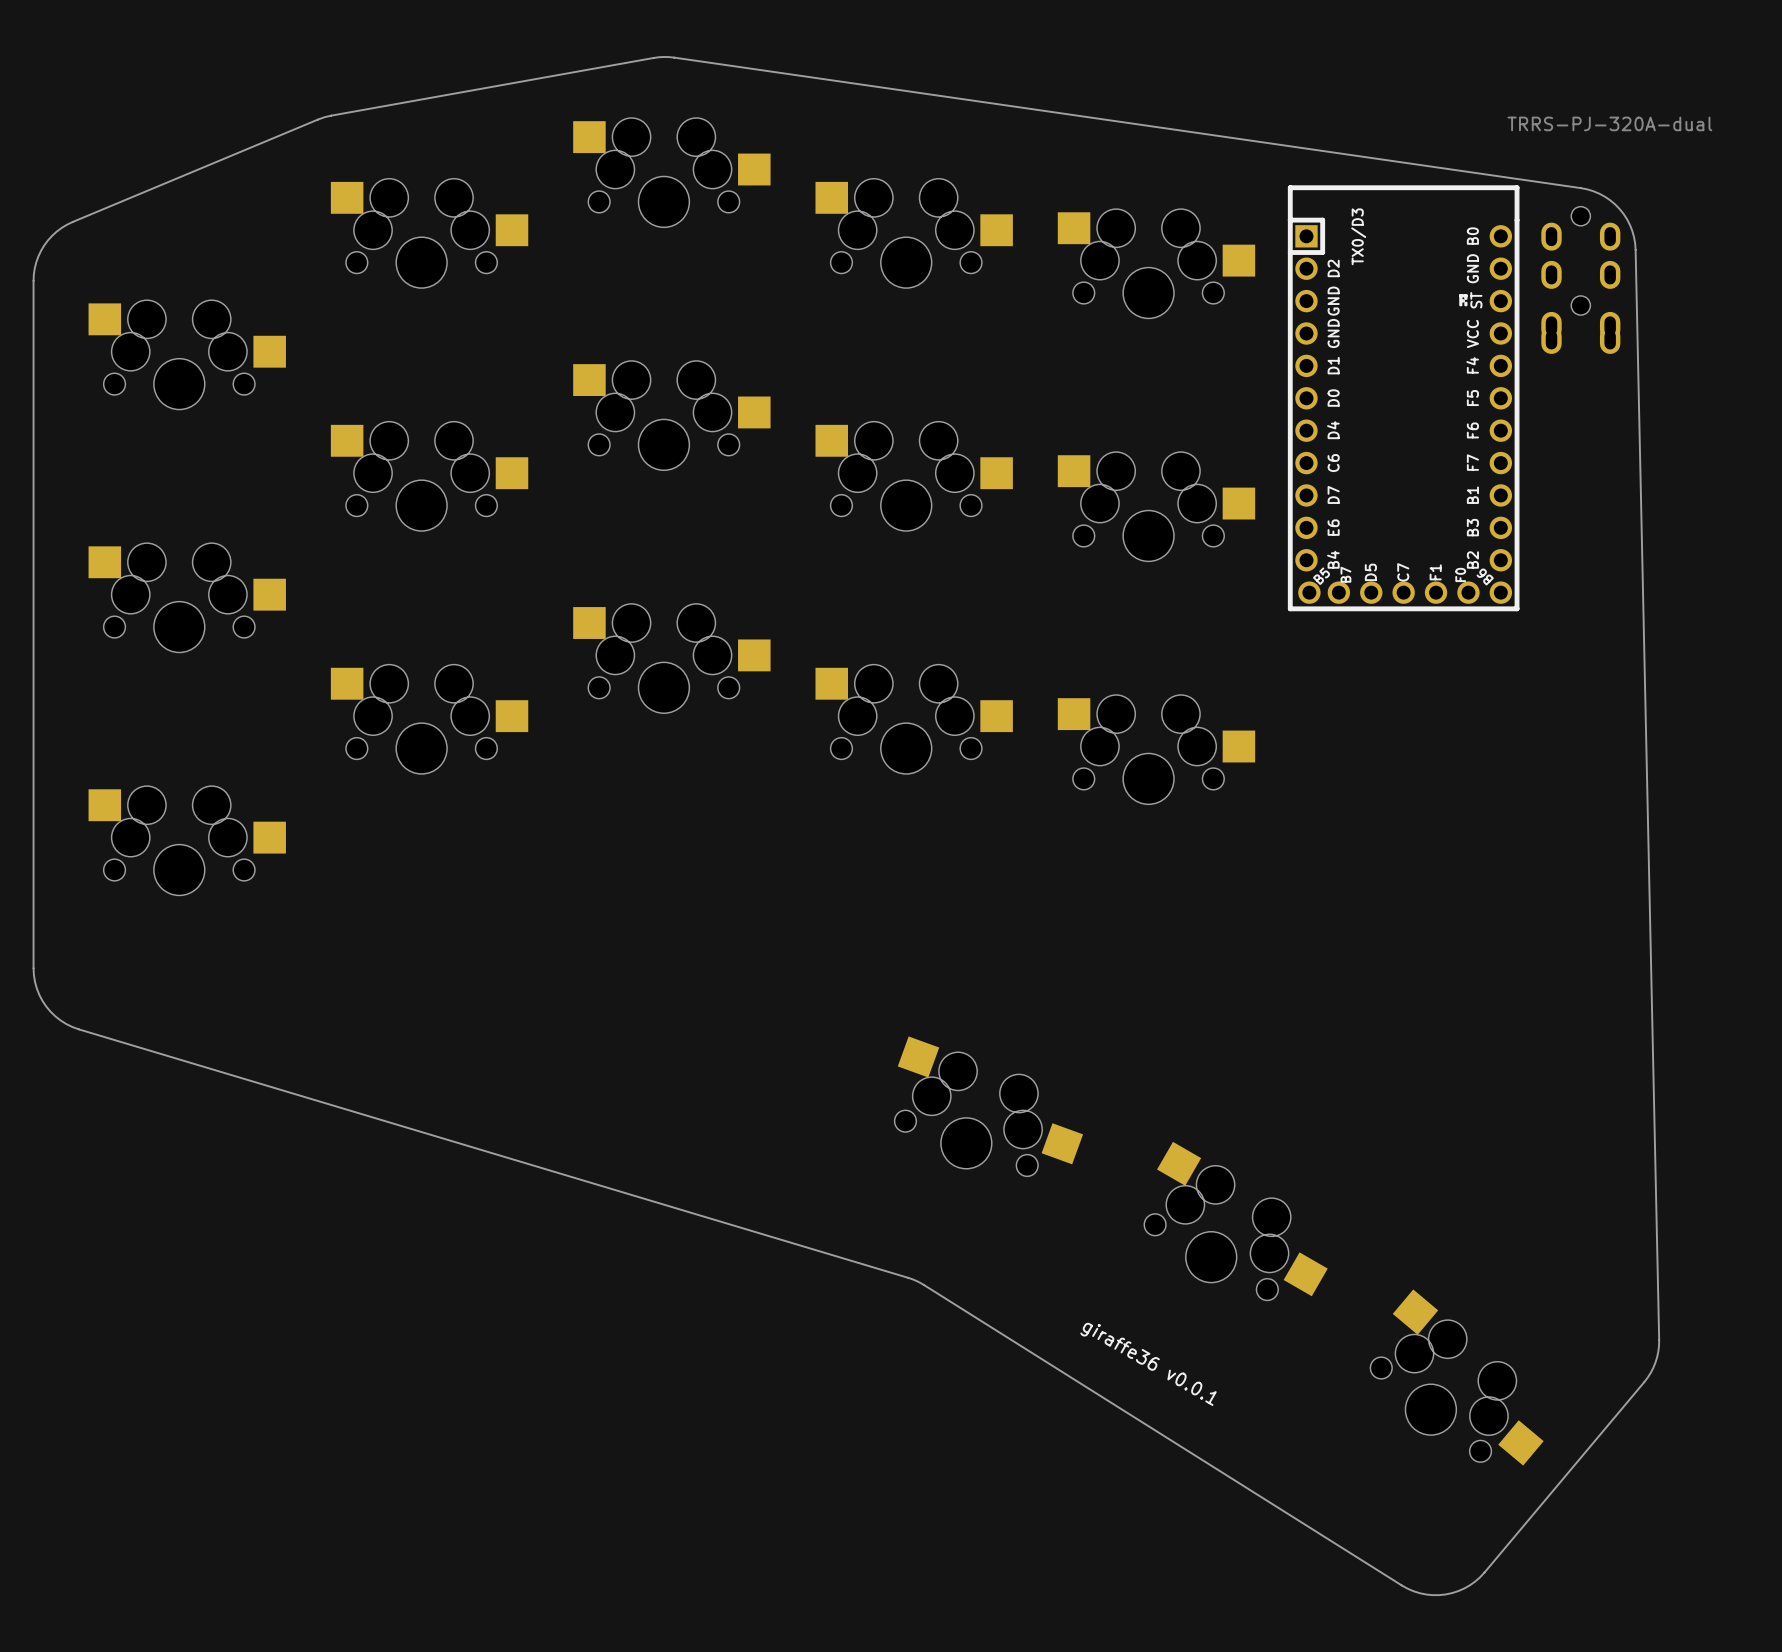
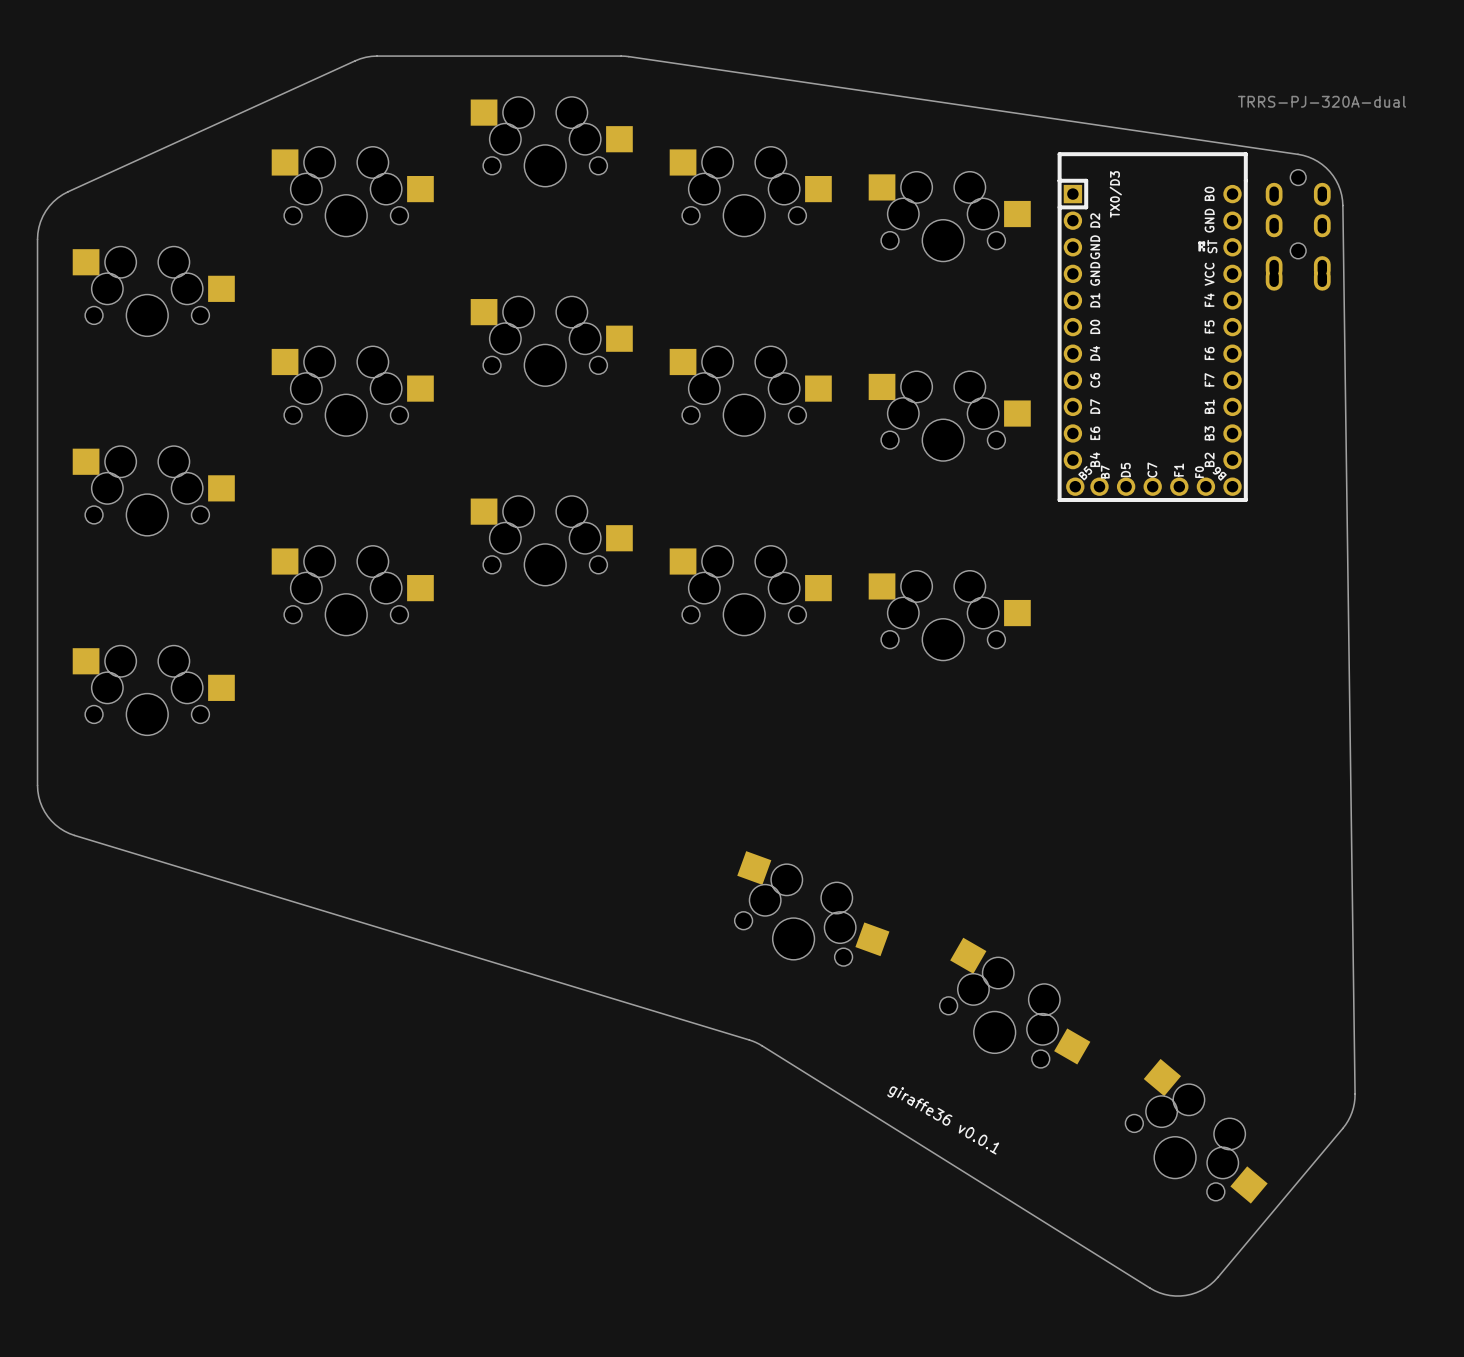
board edge: (674, 57) (1580, 188) (1604, 196) (1615, 204) (1627, 219) (1632, 231) (1635, 249) (1658, 1351) (1653, 1367) (1644, 1382) (1484, 1572) (1464, 1588) (1445, 1594) (1432, 1595) (1419, 1593) (1401, 1585) (916, 1280) (79, 1029) (55, 1016) (39, 994) (33, 968) (33, 280) (36, 262) (44, 245) (56, 231) (72, 221) (324, 117) (653, 57) (674, 57) -> (621, 56) (1298, 154) (1308, 156) (1322, 164) (1333, 175) (1338, 184) (1342, 205) (1354, 1103) (1350, 1116) (1342, 1128) (1217, 1277) (1201, 1290) (1191, 1294) (1175, 1296) (1164, 1294) (1150, 1288) (755, 1042) (74, 835) (55, 824) (42, 806) (37, 785) (37, 239) (40, 221) (49, 206) (68, 191) (365, 57) (621, 56)

